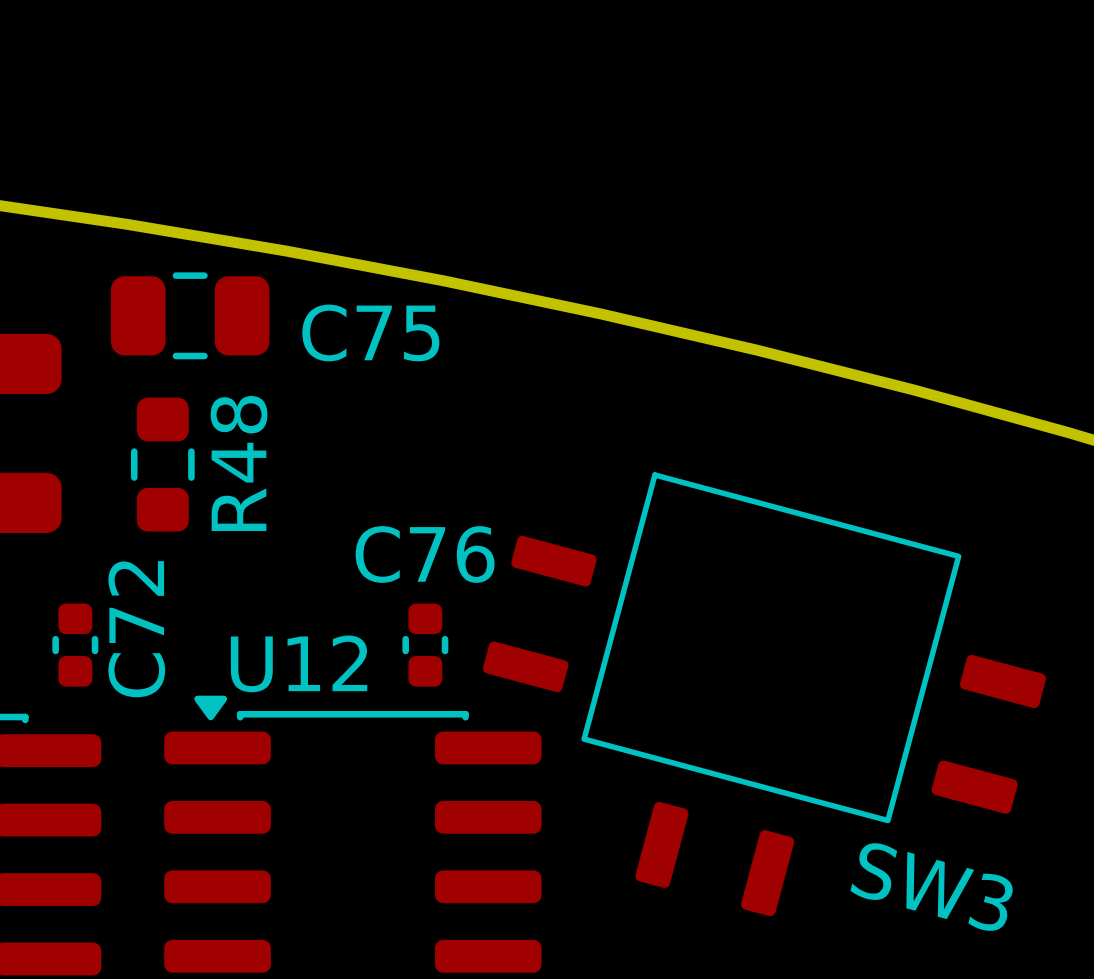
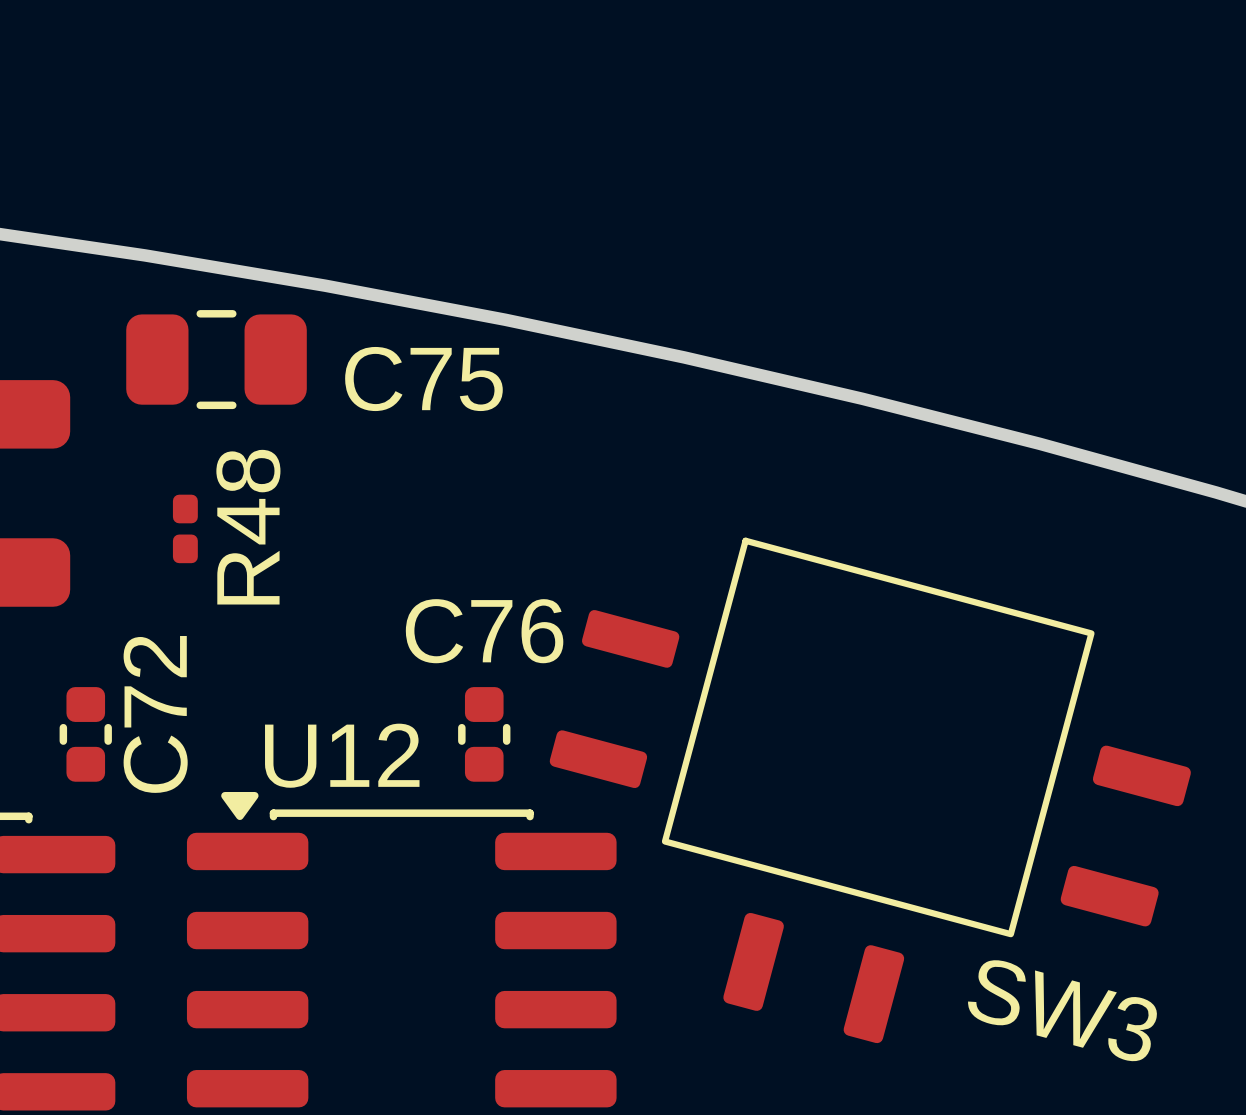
R48 footprint: [130, 397, 195, 532] -> [172, 494, 198, 564]

